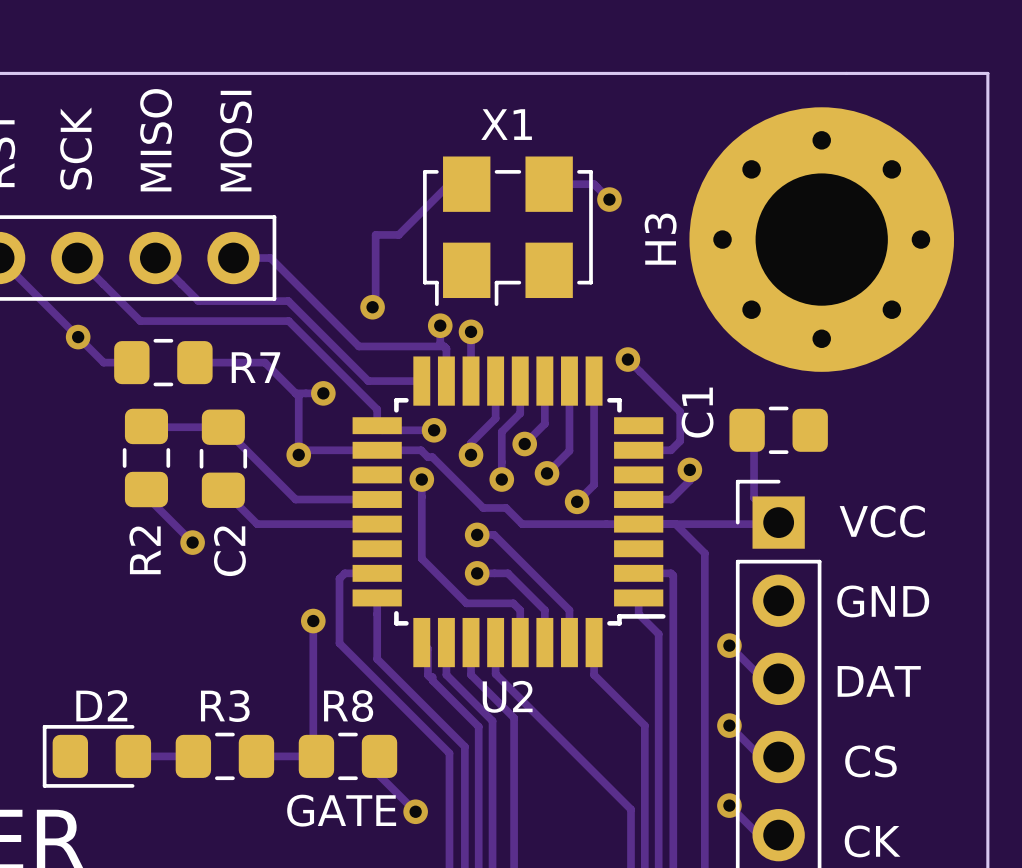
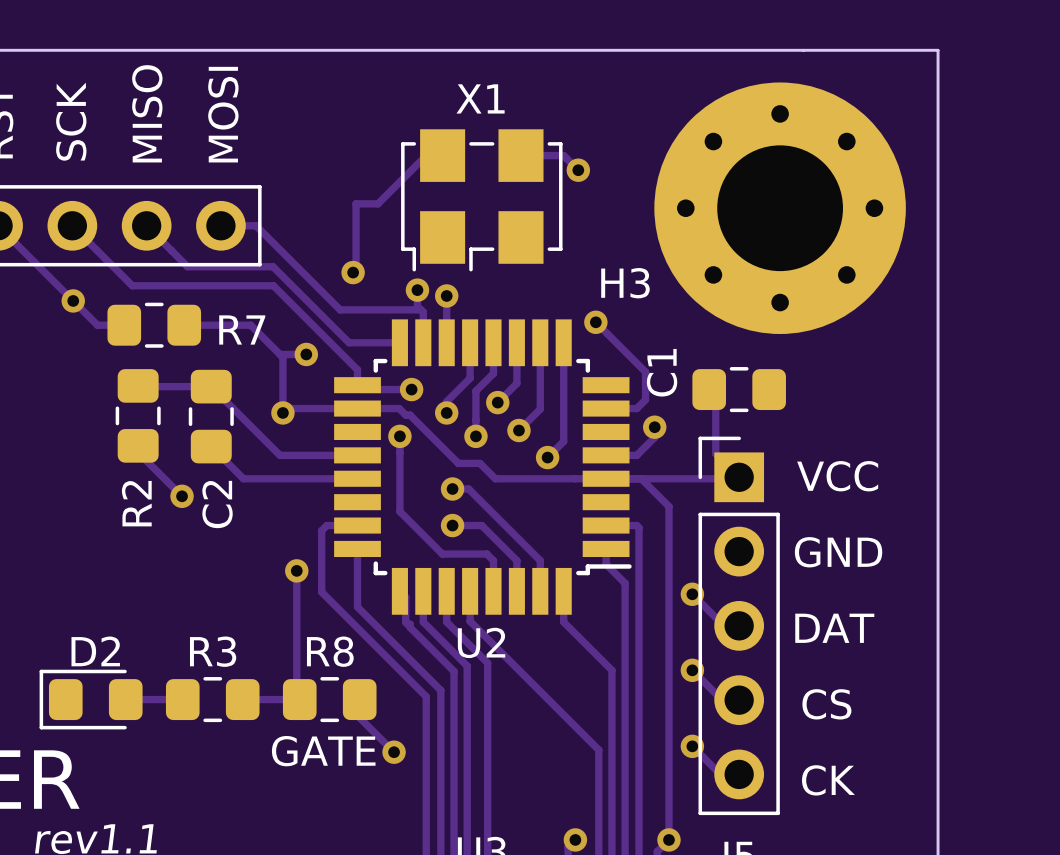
H3 name rotation: 0° (660, 239) -> 90° clockwise (625, 283)
H3 name position: H3 (660, 239) -> H3 (625, 283)

